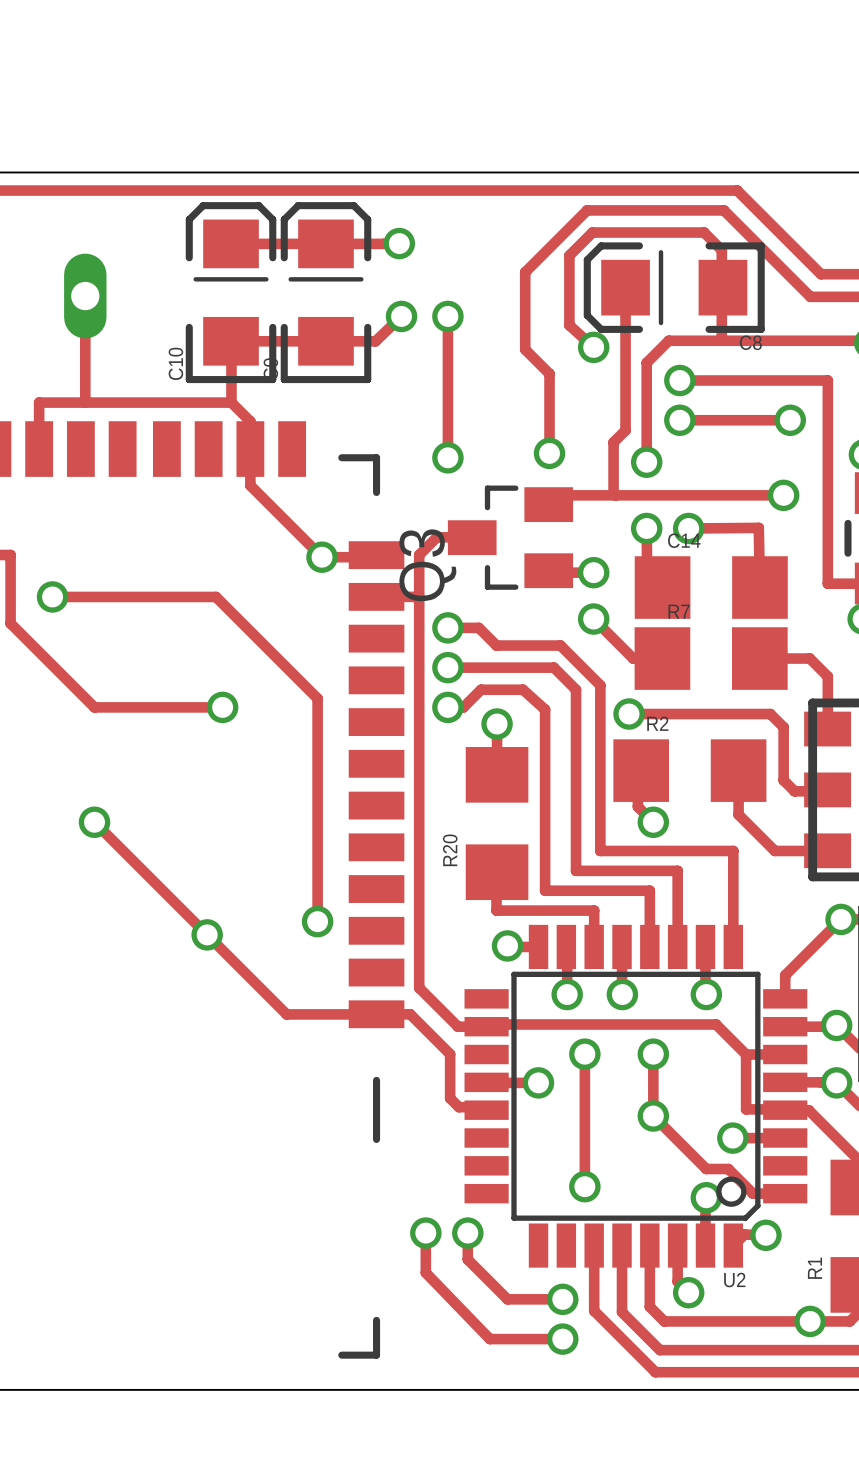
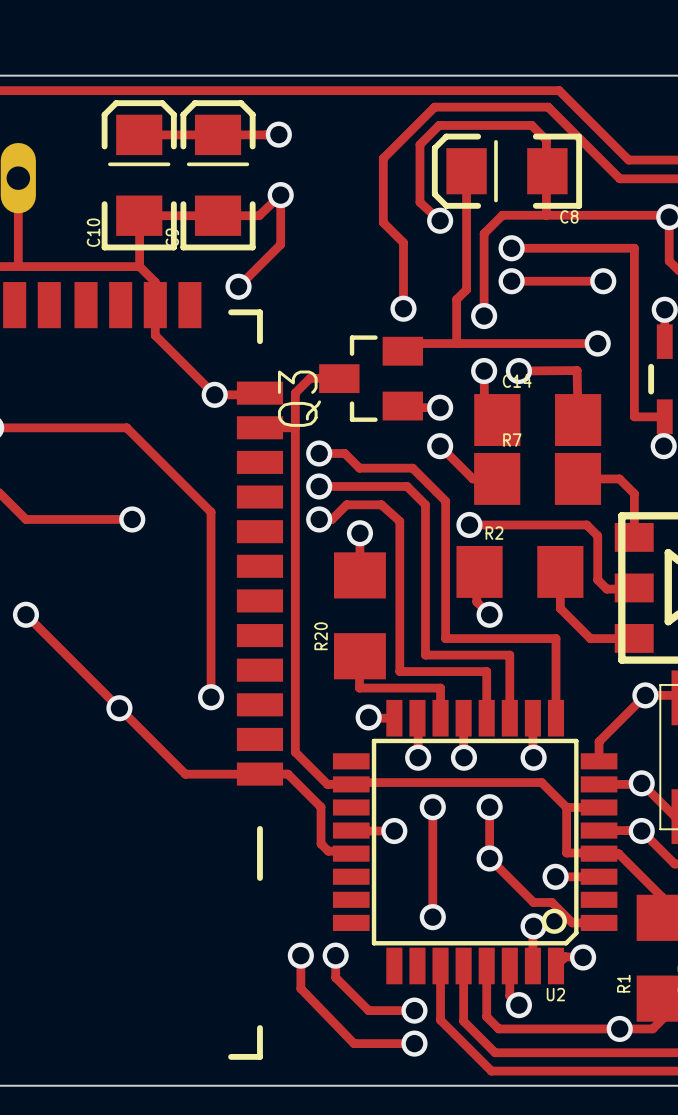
track: none -> (280, 195) (280, 244) (238, 286)
track: (447, 316) (447, 457) -> none
via: (447, 316) -> none
via: none -> (238, 286)
via: (447, 457) -> none

